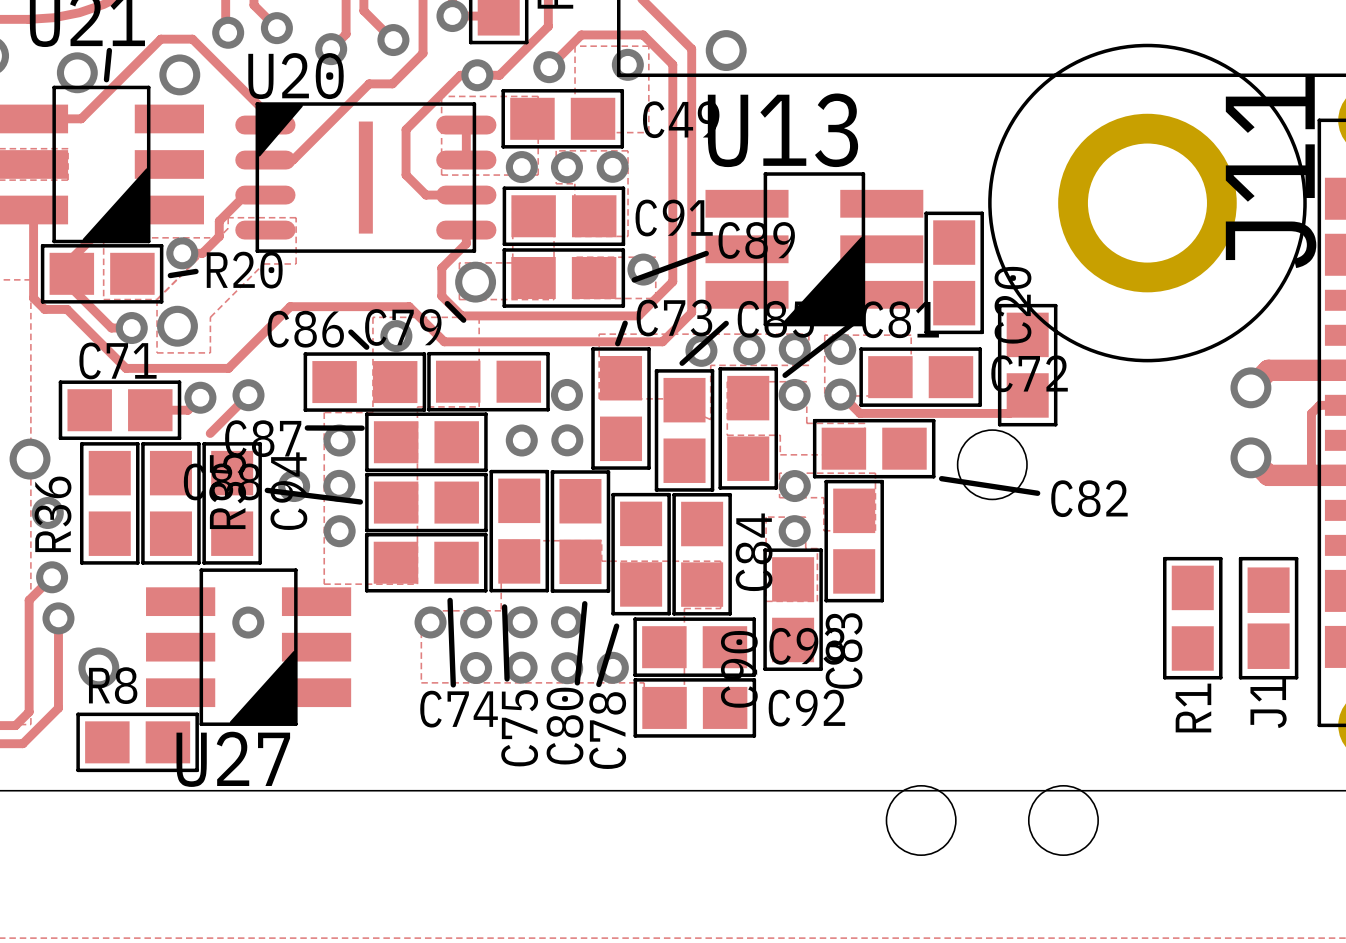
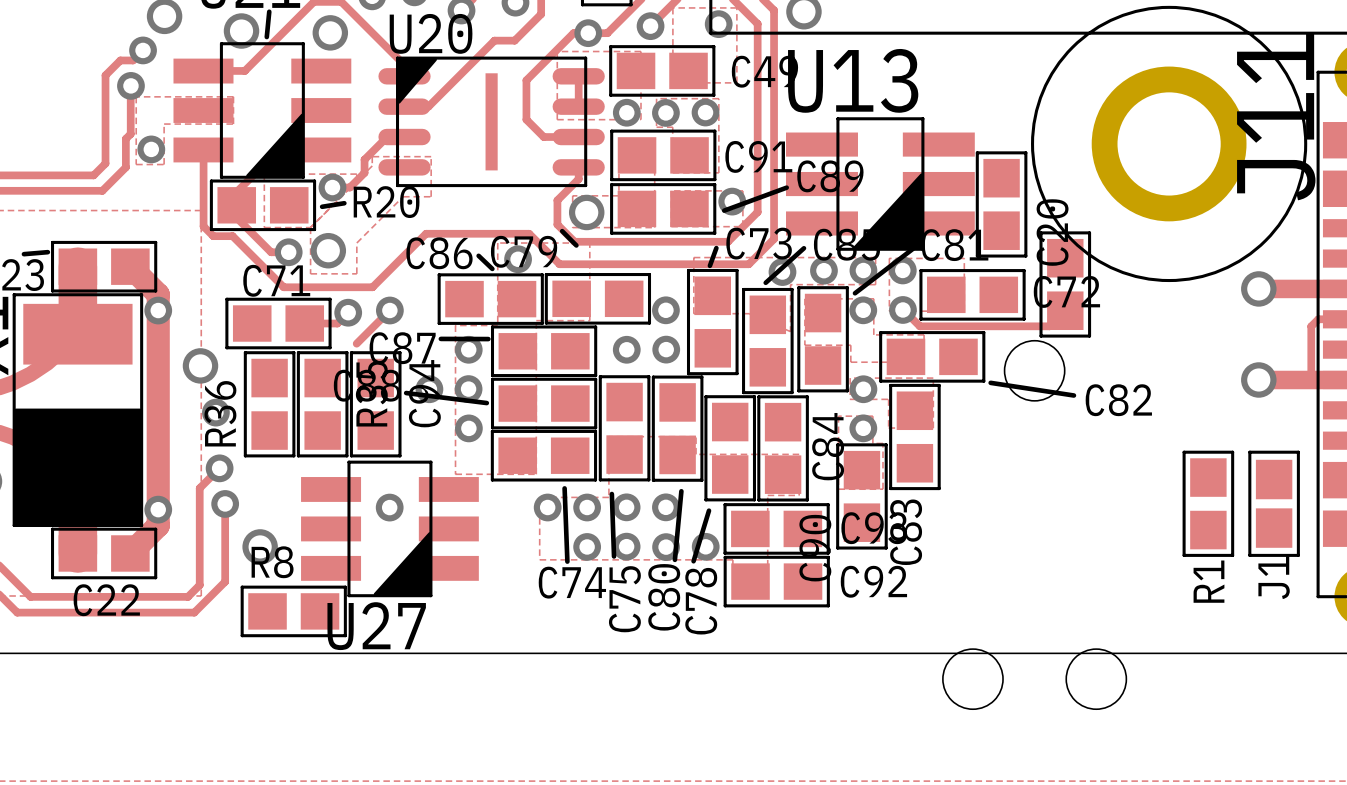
via position: (1250, 387) -> (1258, 288)
via position: (1250, 457) -> (1258, 379)

